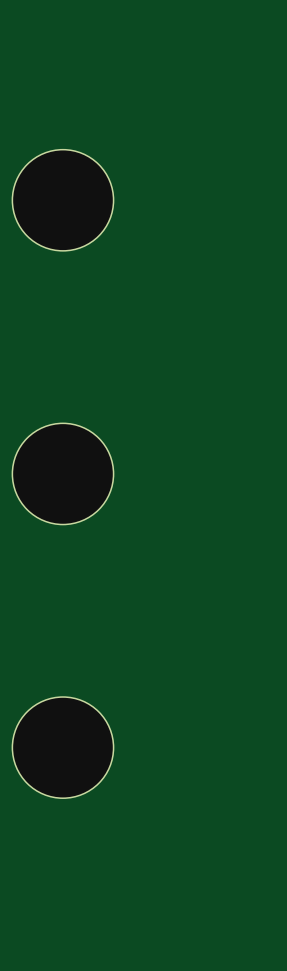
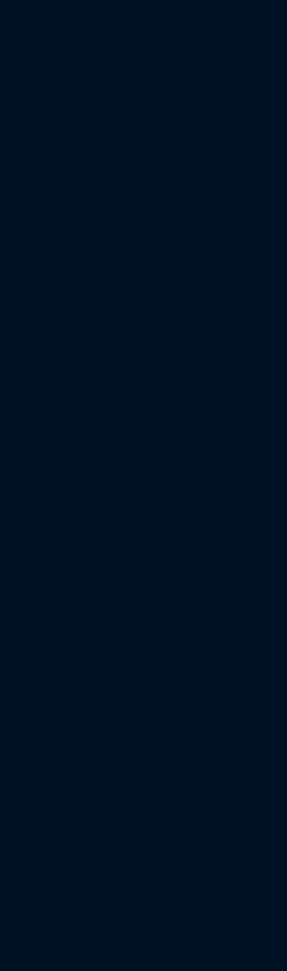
part: (62, 200) -> none
part: (62, 473) -> none
part: (62, 747) -> none

